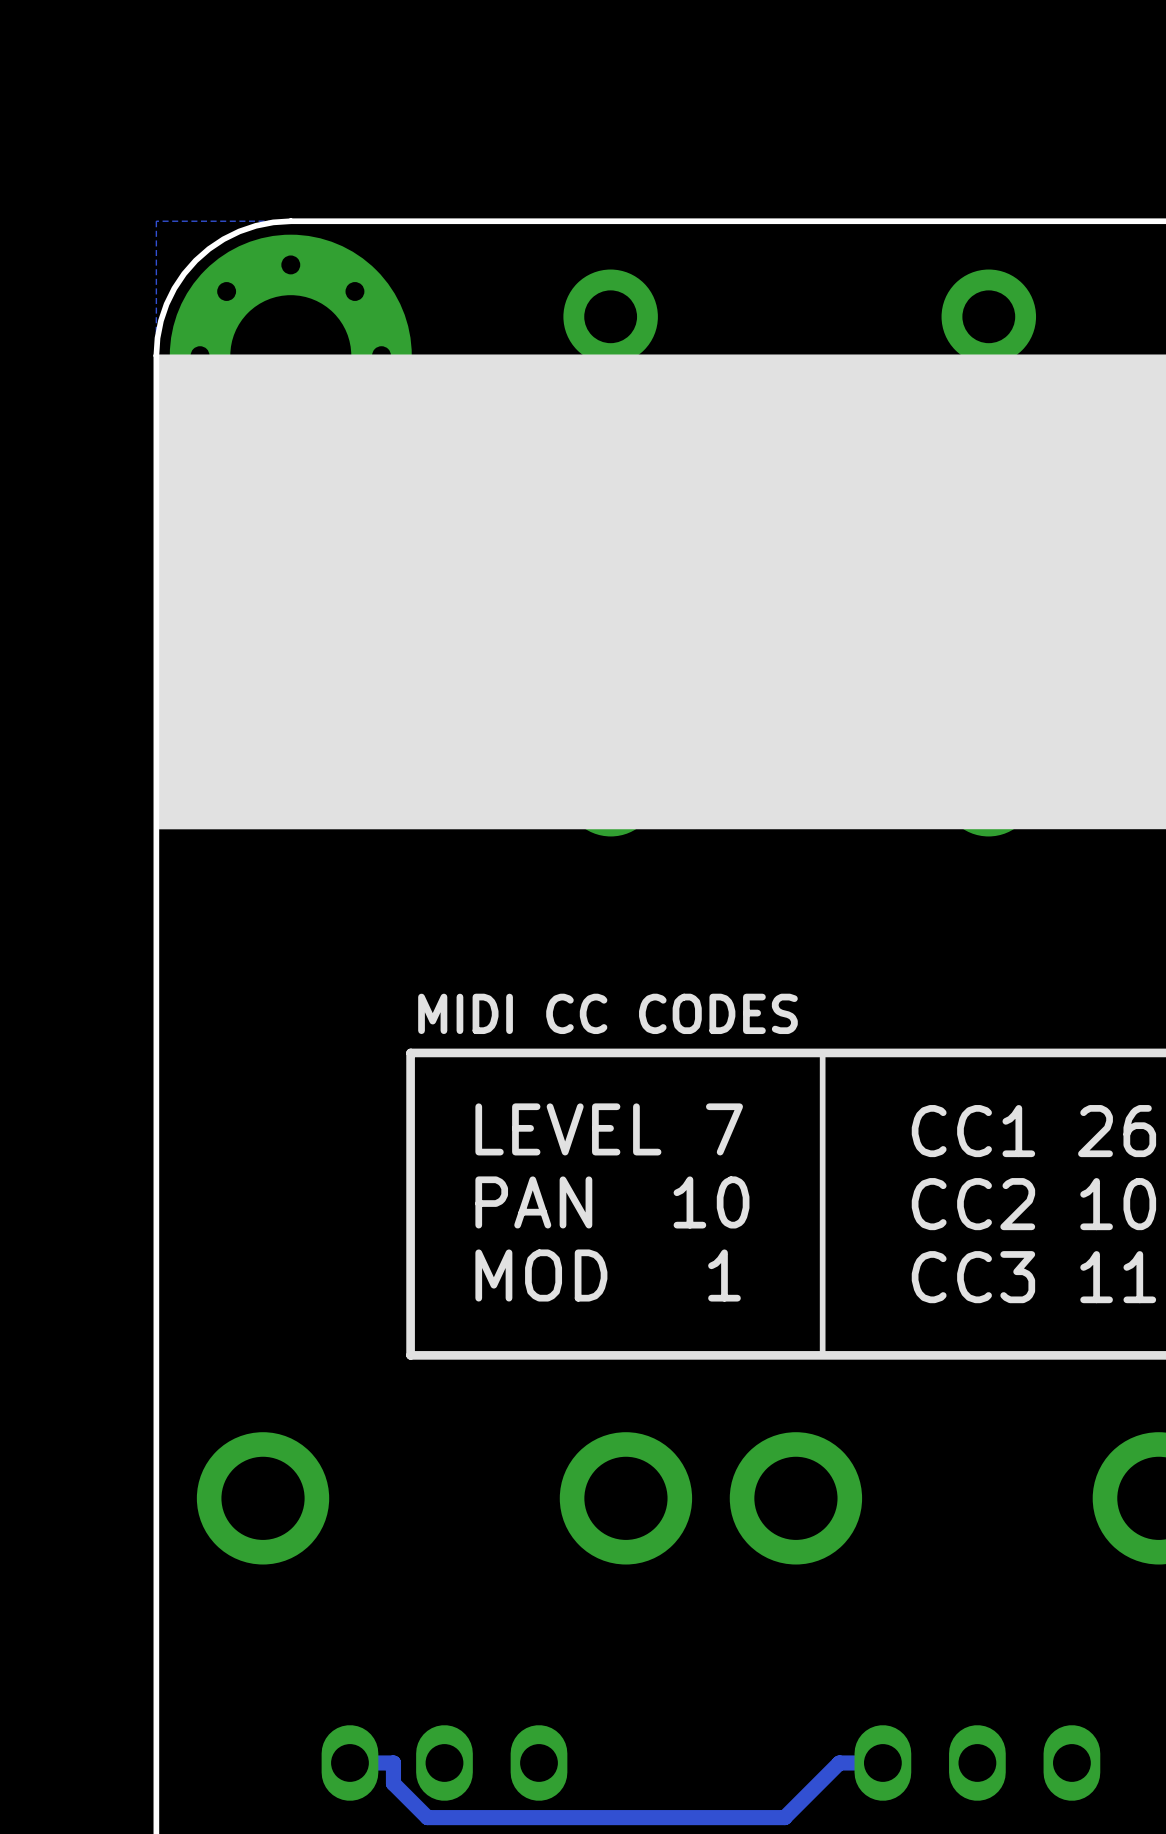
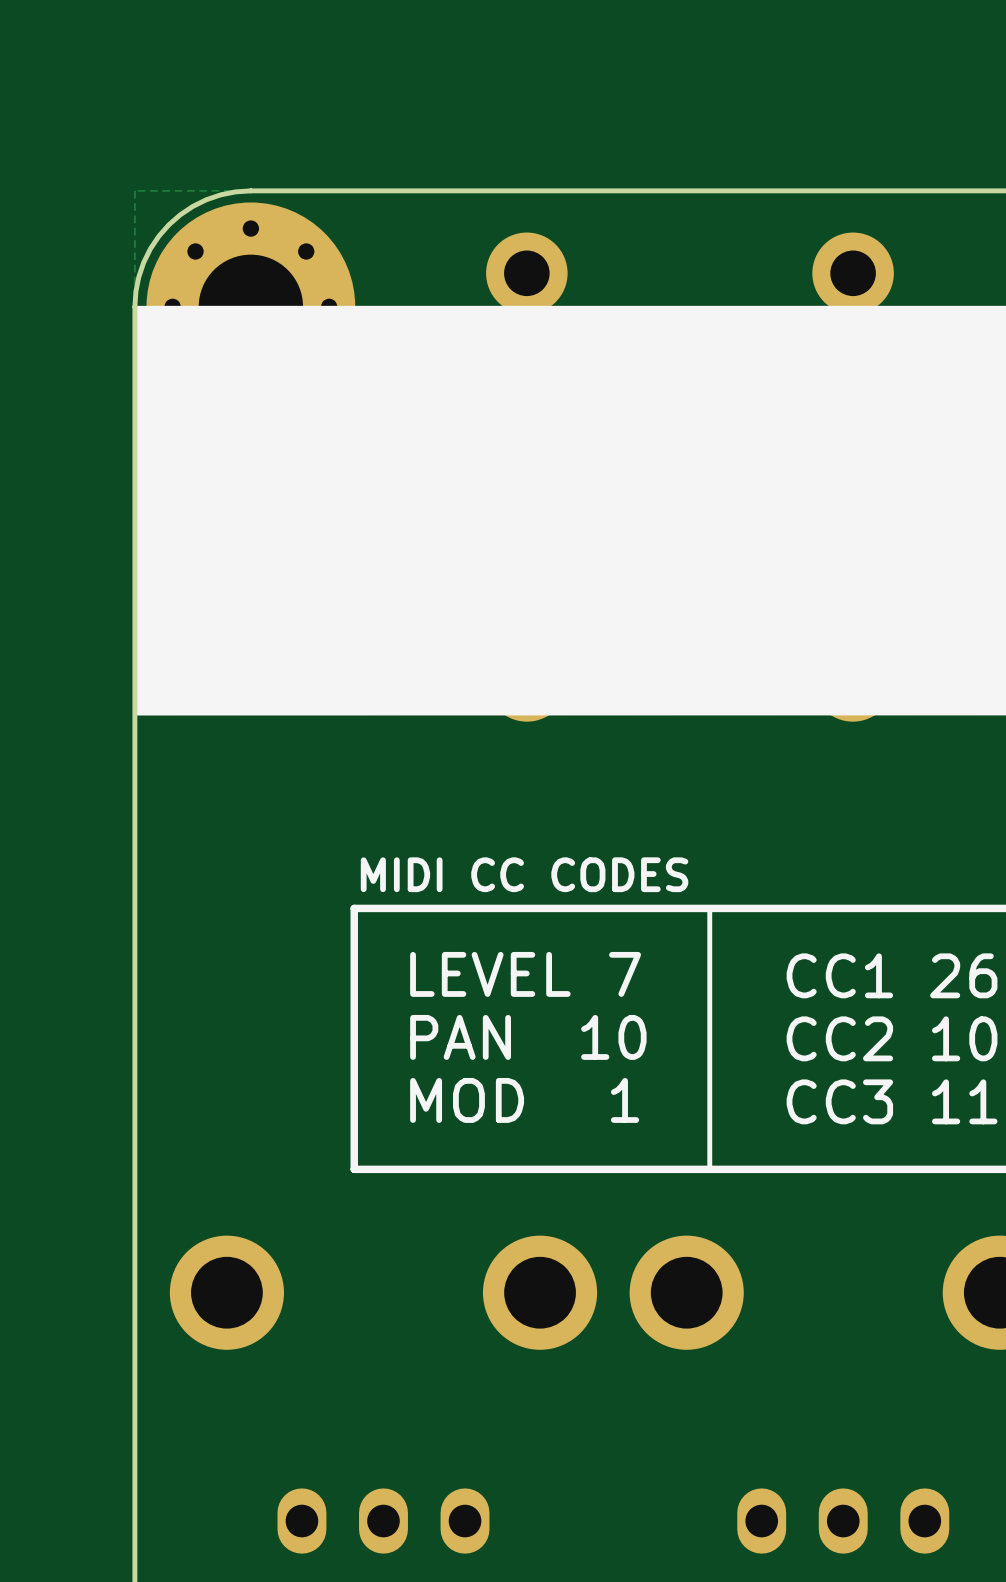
track: (882, 1762) (839, 1762) (784, 1817) (427, 1817) (393, 1783) (393, 1762) (349, 1762) -> none

